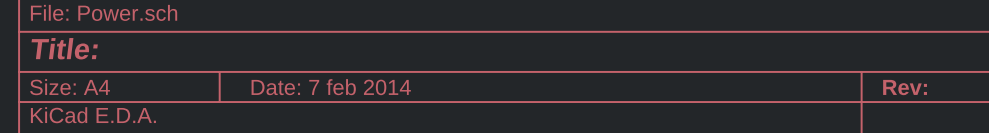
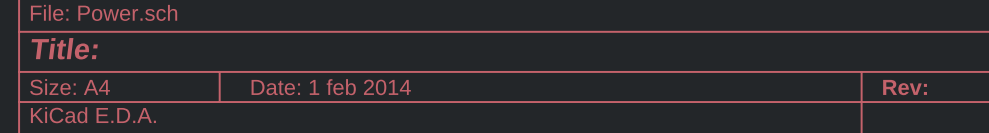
title block: Date: 7 feb 2014 (331, 87) -> Date: 1 feb 2014 (331, 87)

